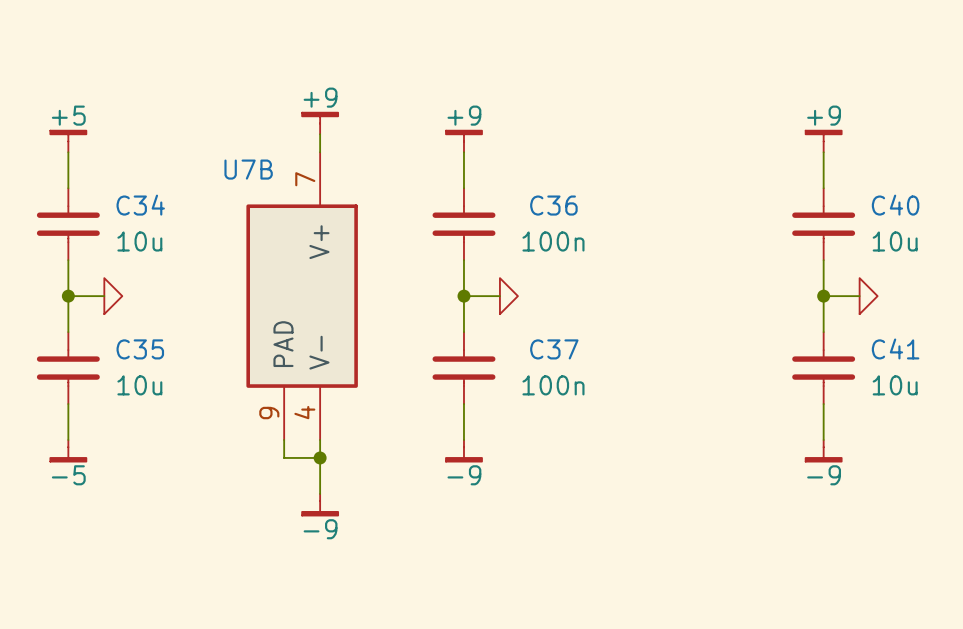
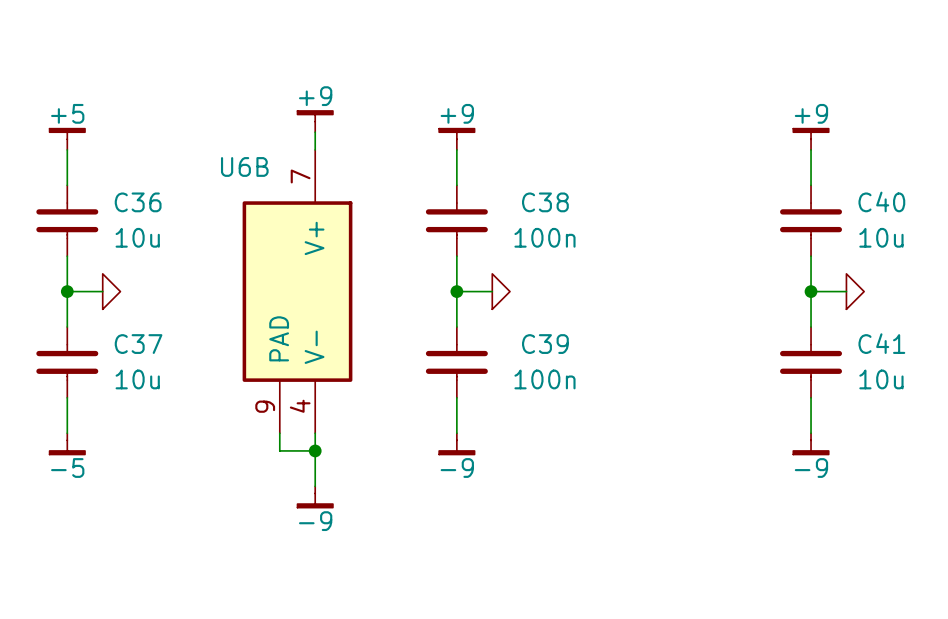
U7B name: U7B (248, 169) -> U6B (244, 166)
C34 name: C34 (140, 205) -> C36 (138, 202)
C36 name: C36 (553, 205) -> C38 (545, 202)
C35 name: C35 (140, 349) -> C37 (138, 344)
C37 name: C37 (554, 349) -> C39 (545, 344)

